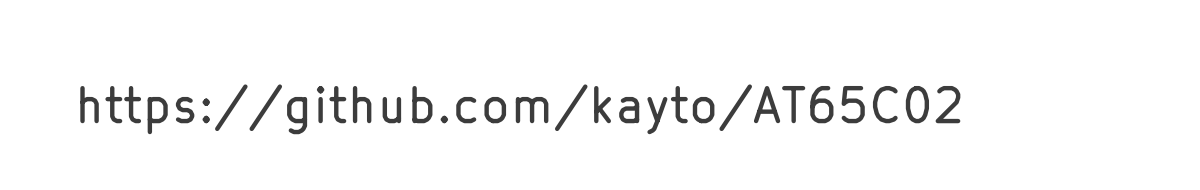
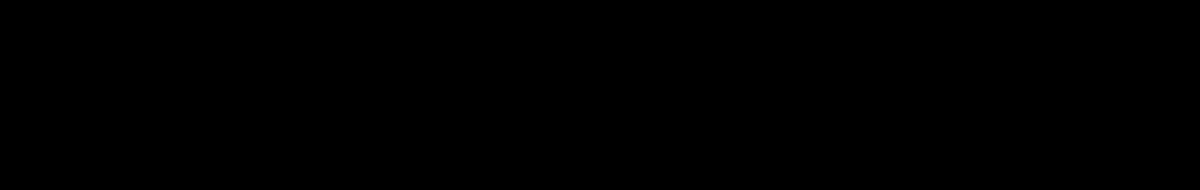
text: https://github.com/kayto/AT65C02 (520, 109) -> none

